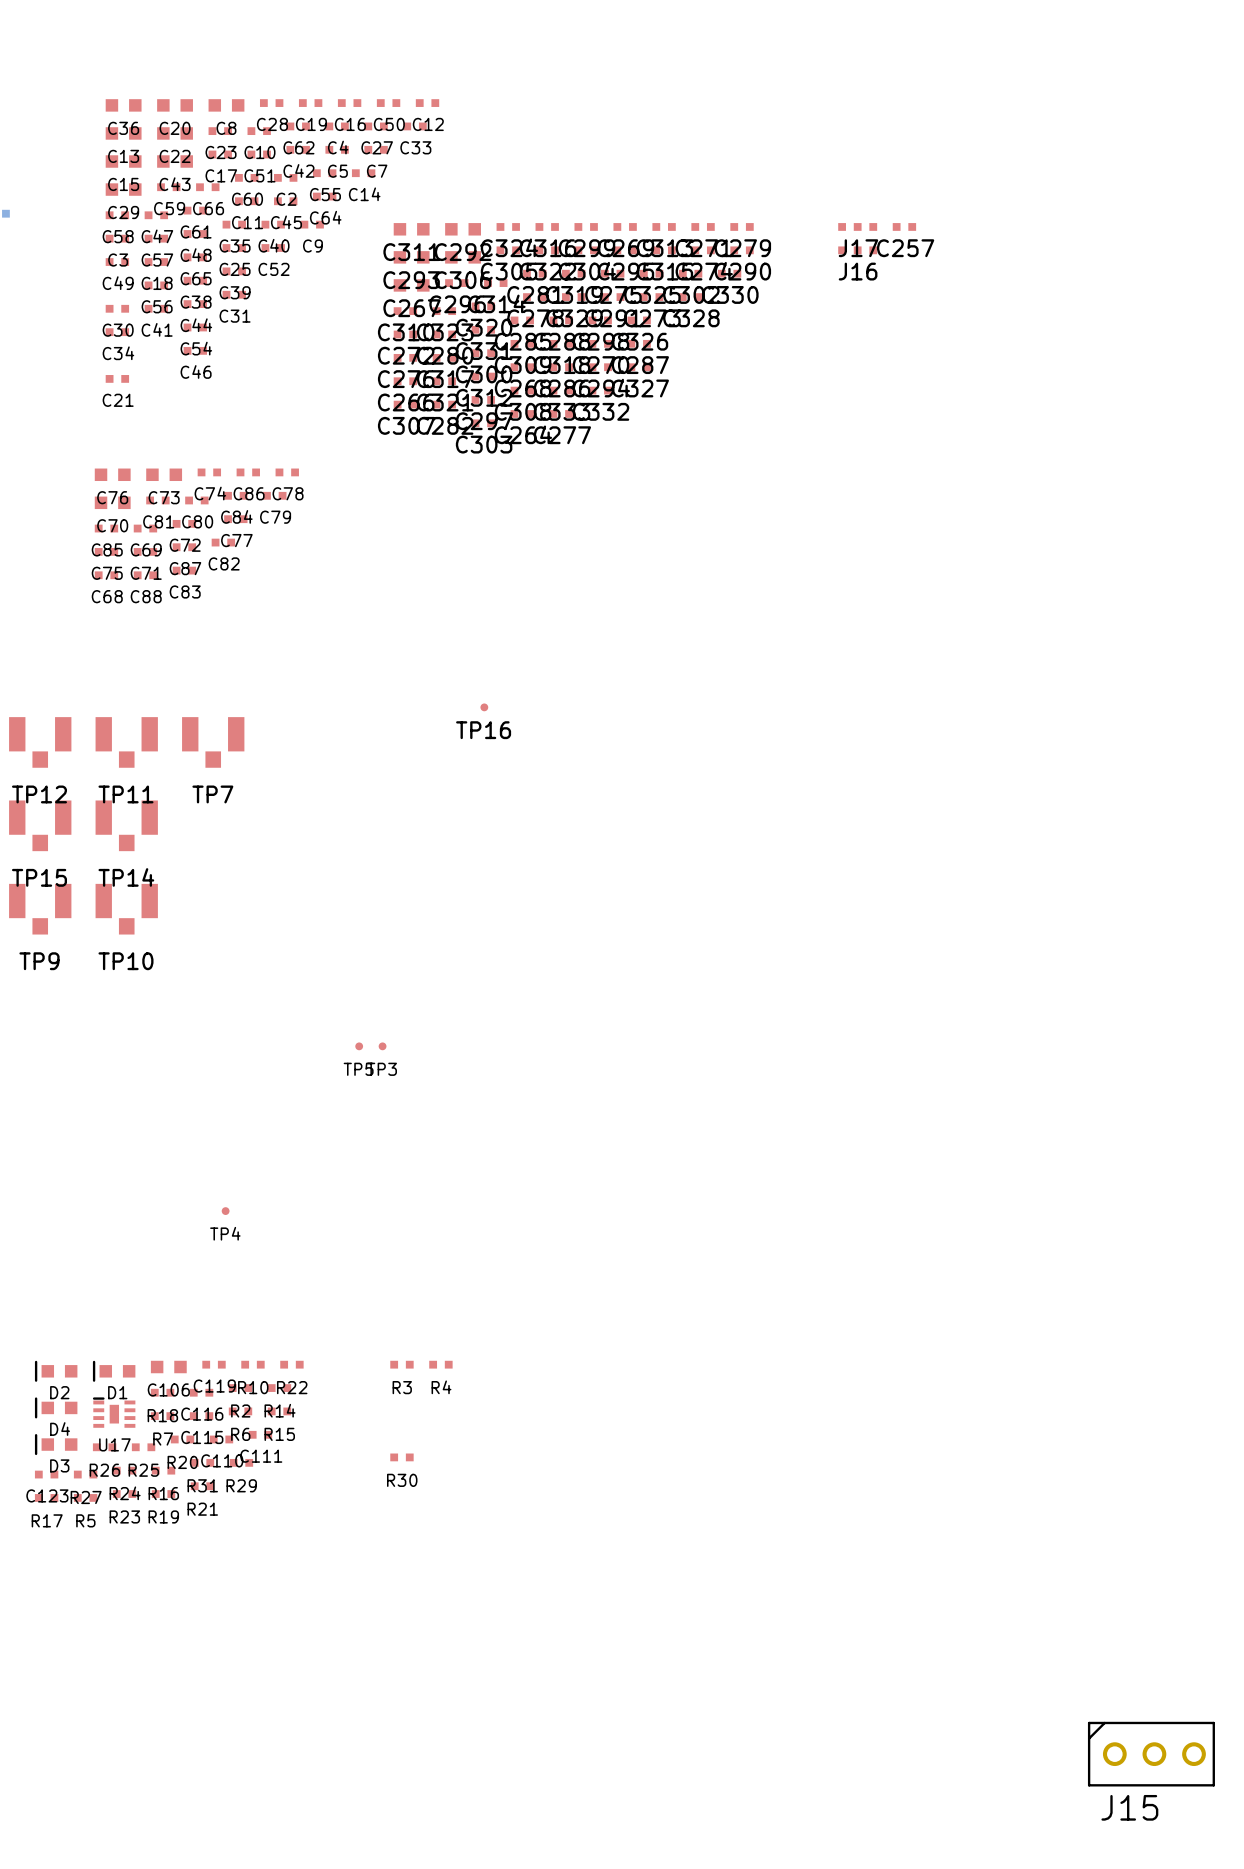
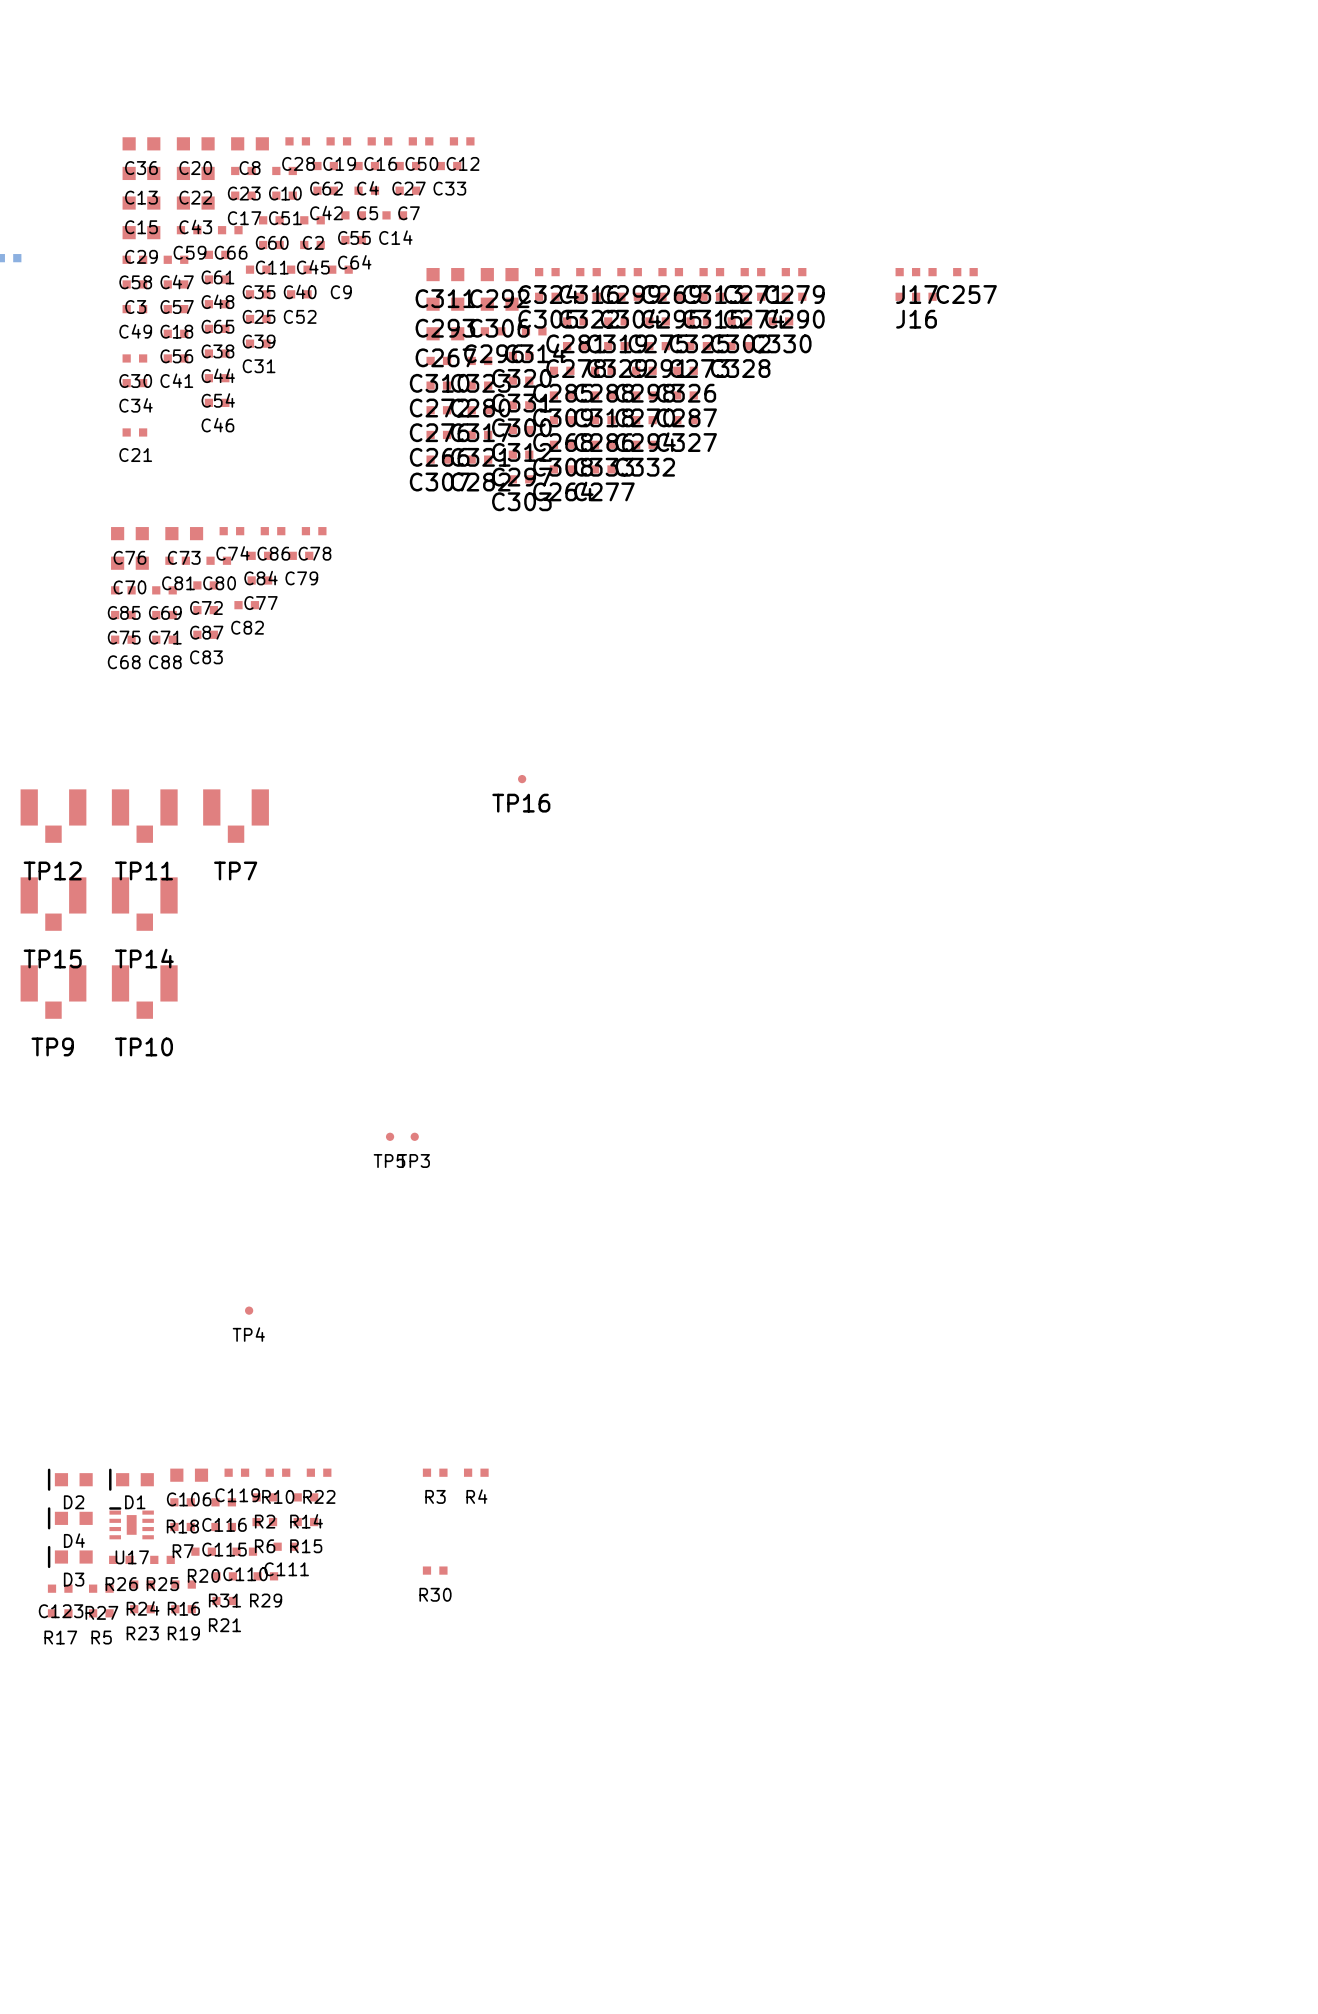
J15: (1151, 1754) -> none

